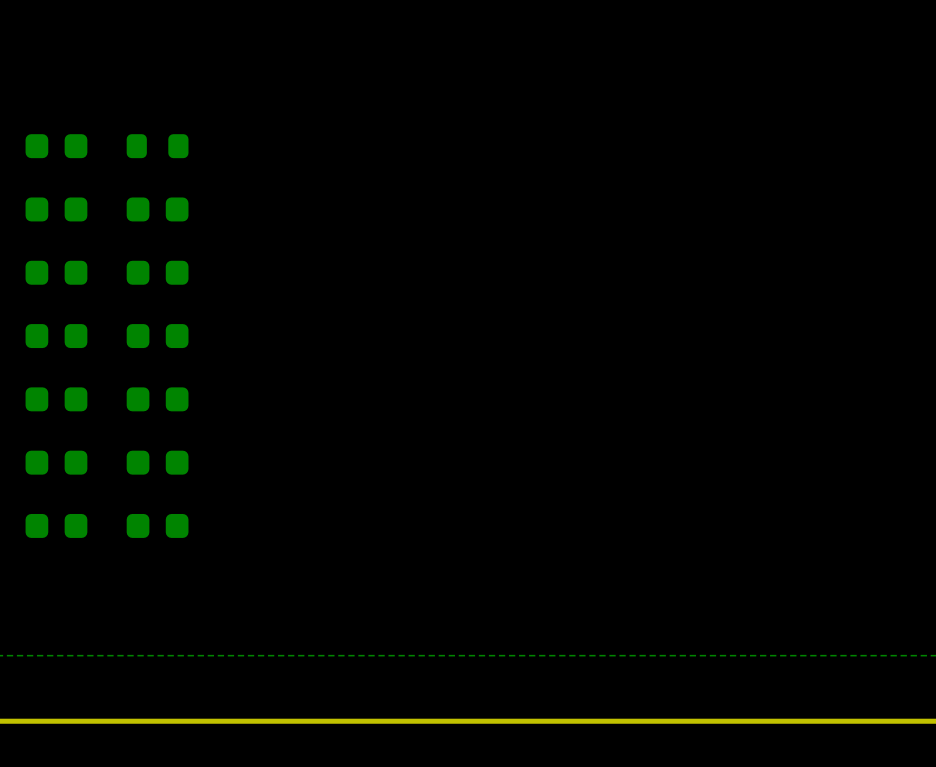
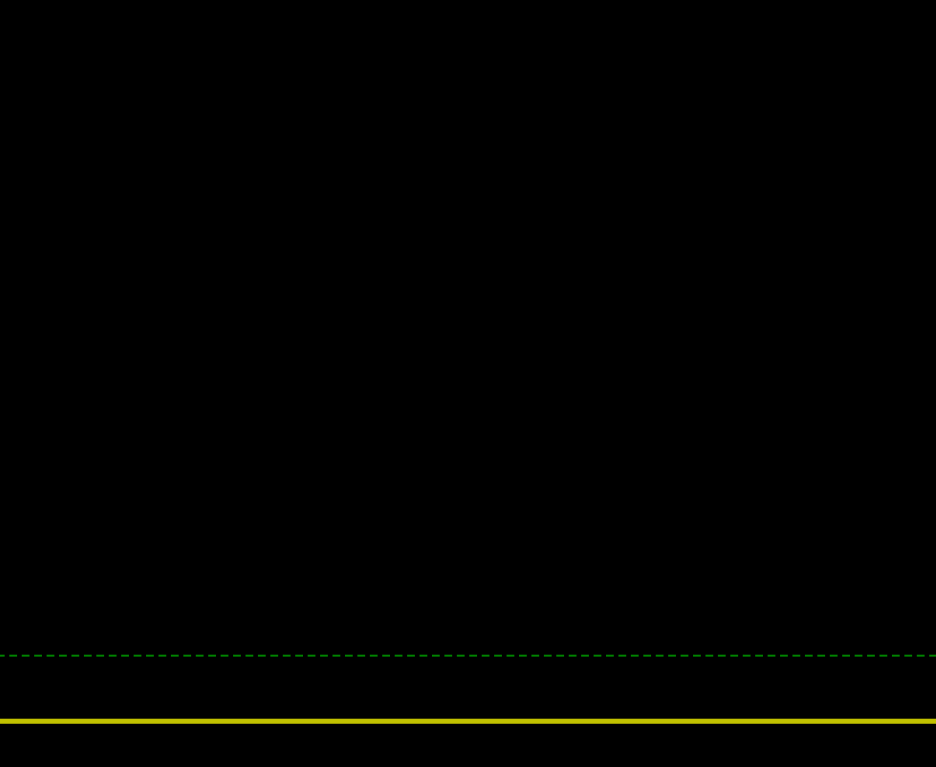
part: (56, 146) -> none
part: (157, 146) -> none
part: (56, 209) -> none
part: (157, 209) -> none
part: (56, 272) -> none
part: (157, 272) -> none
part: (56, 336) -> none
part: (157, 336) -> none
part: (56, 399) -> none
part: (157, 399) -> none
part: (56, 462) -> none
part: (157, 462) -> none
part: (56, 525) -> none
part: (157, 525) -> none

